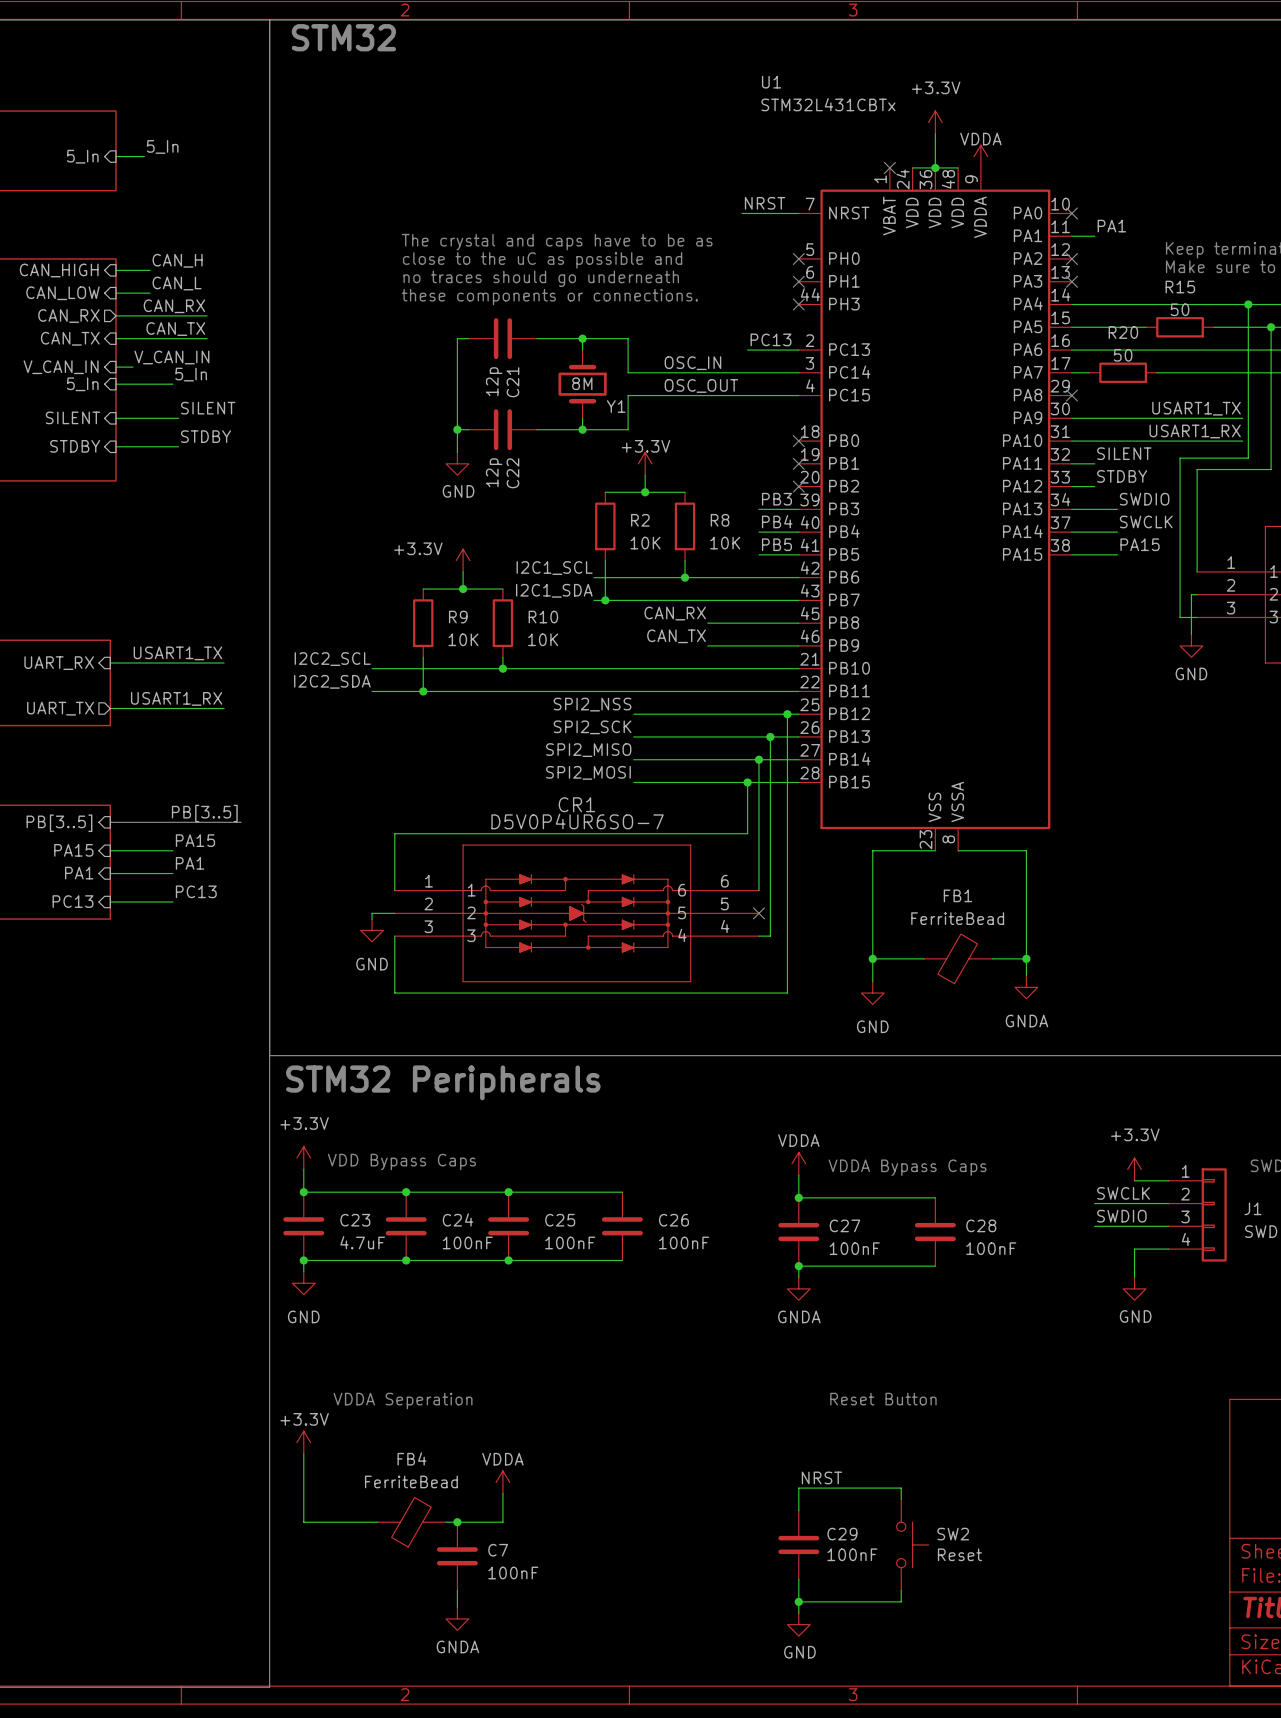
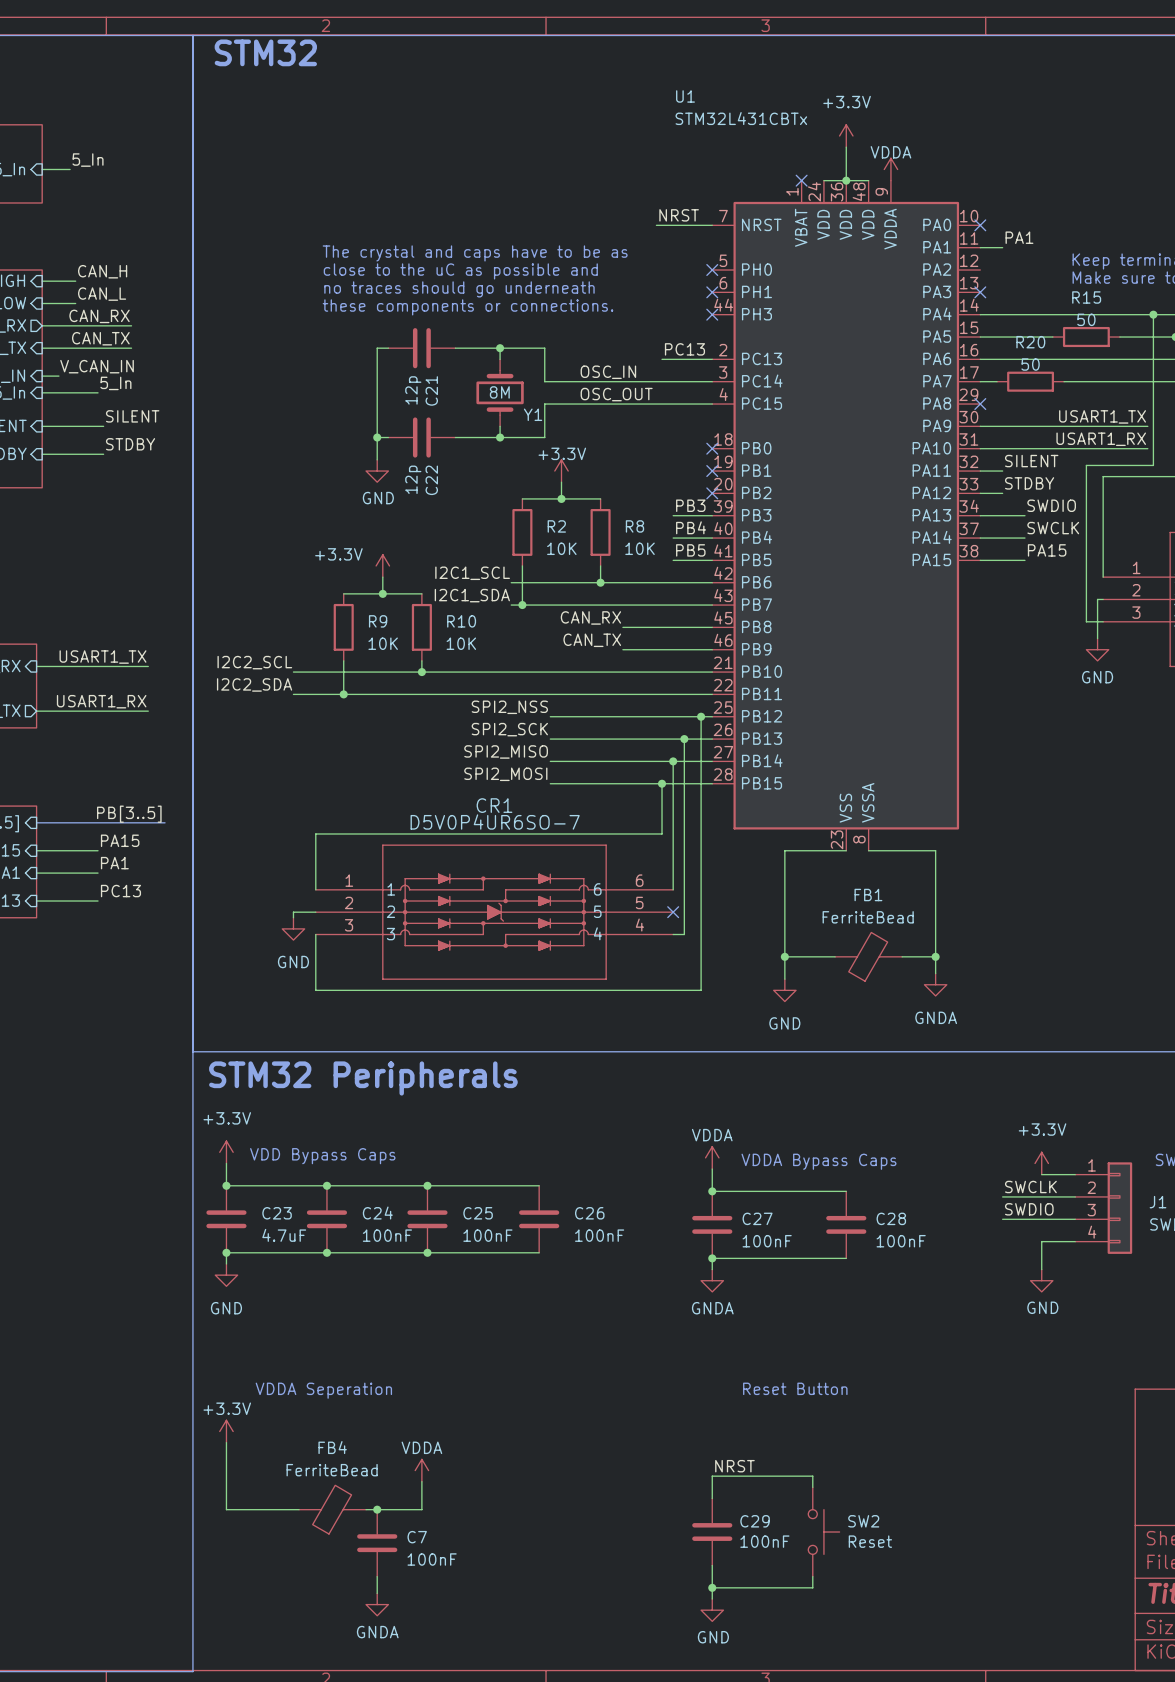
no-connect mark: (1071, 258) -> none

